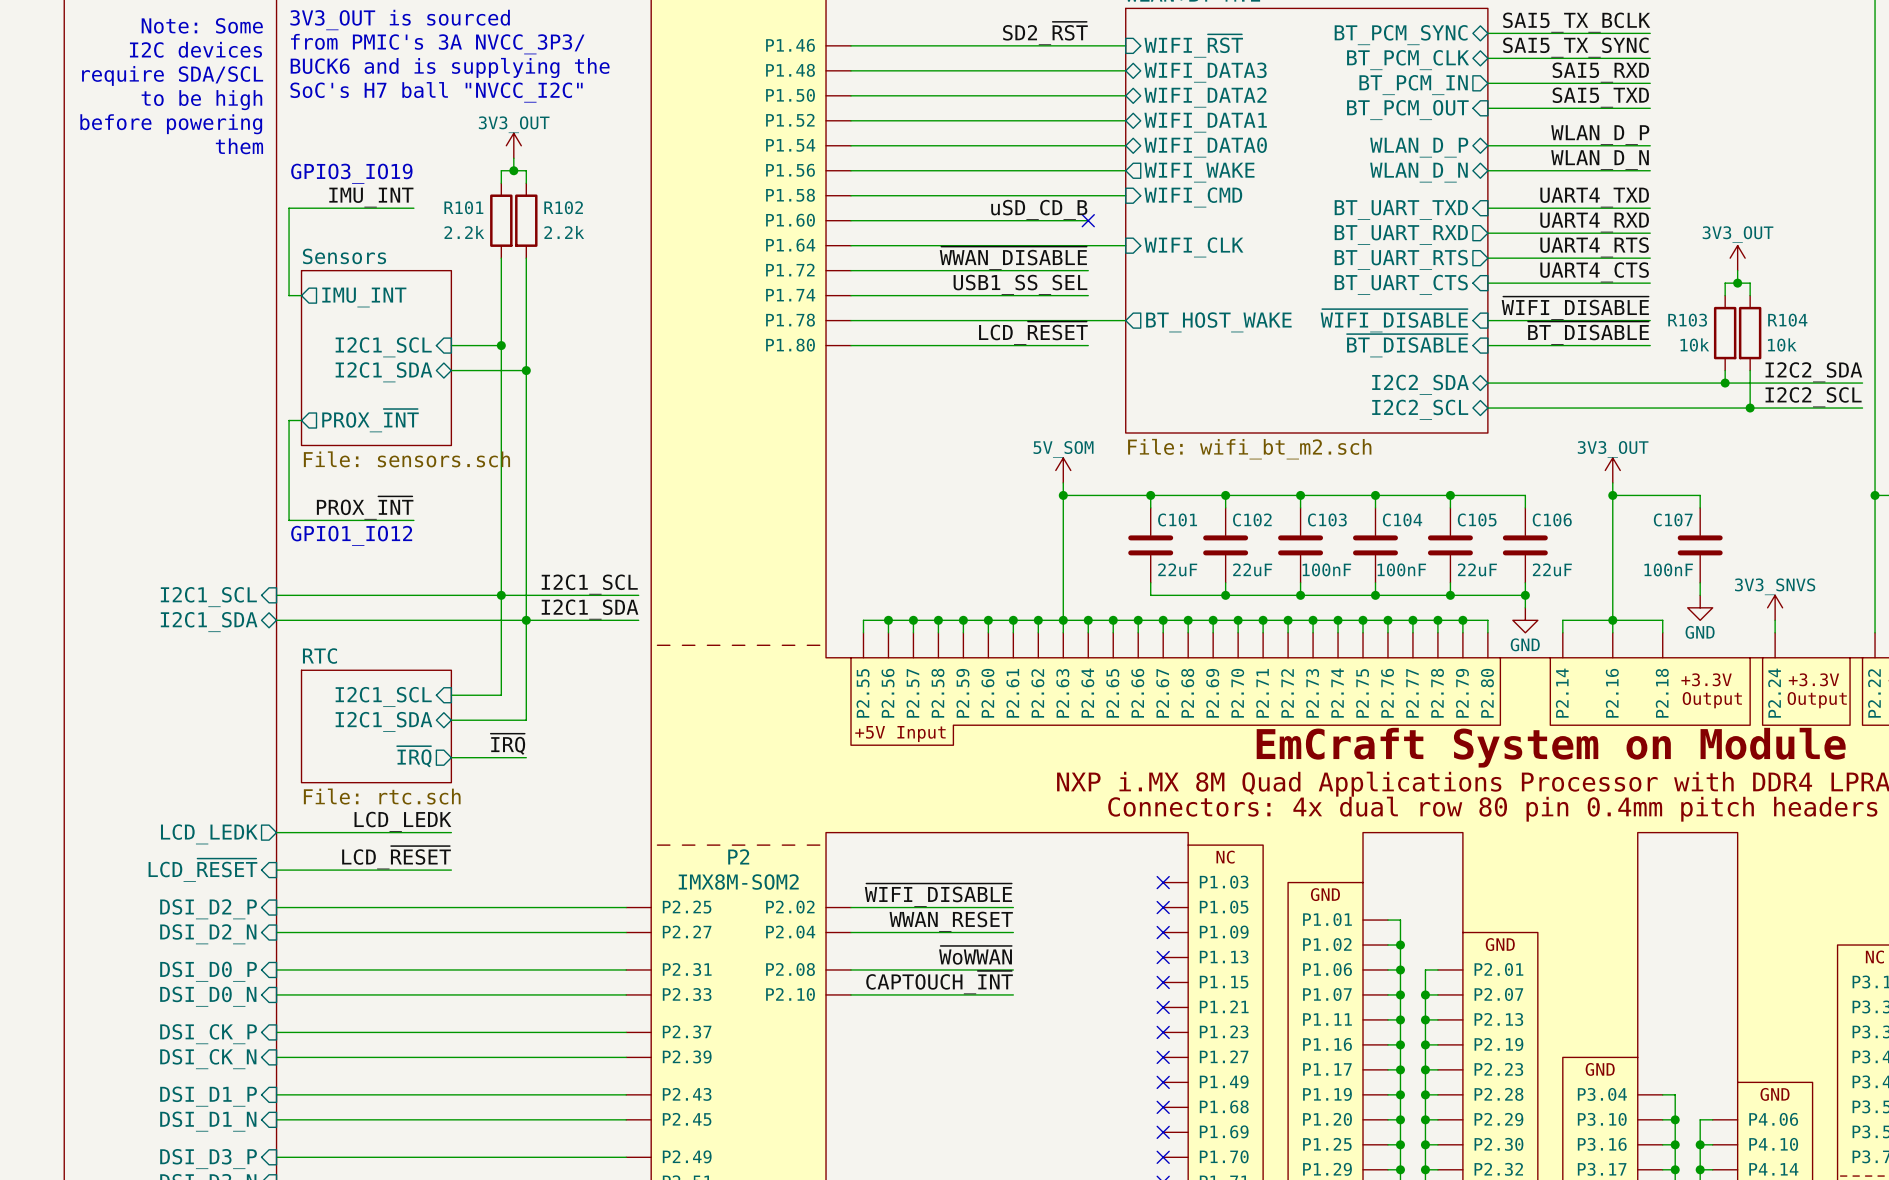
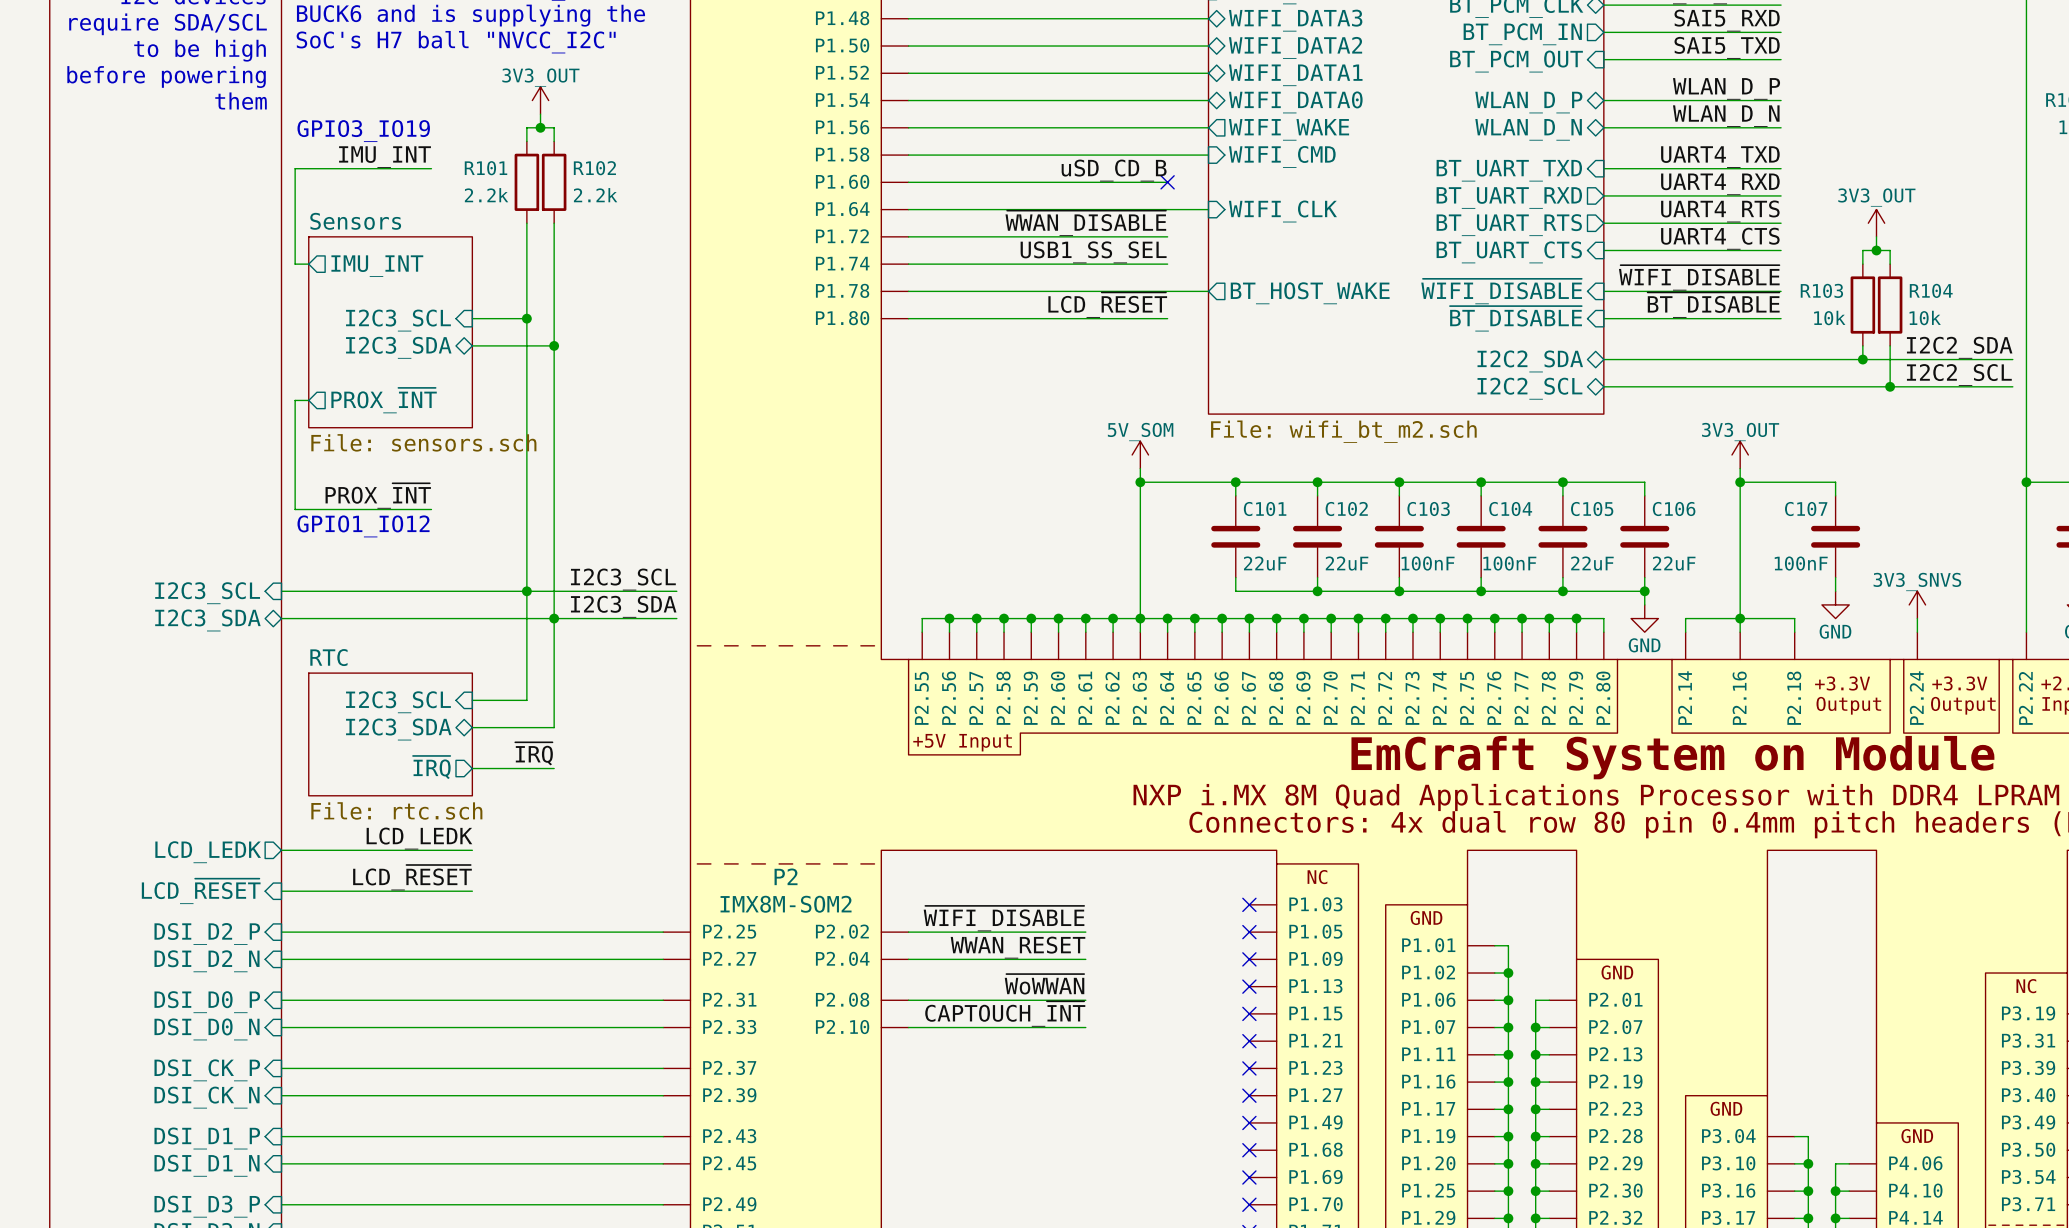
sheet pin: I2C1_SCL (383, 347) -> I2C3_SCL (398, 320)
sheet pin: I2C1_SDA (383, 372) -> I2C3_SDA (398, 347)
label: I2C1_SCL (589, 584) -> I2C3_SCL (623, 579)
sheet pin: I2C1_SCL (208, 597) -> I2C3_SCL (207, 593)
label: I2C1_SDA (590, 609) -> I2C3_SDA (623, 606)
sheet pin: I2C1_SDA (209, 622) -> I2C3_SDA (207, 620)
sheet pin: I2C1_SCL (383, 696) -> I2C3_SCL (398, 702)
sheet pin: I2C1_SDA (383, 721) -> I2C3_SDA (398, 729)

